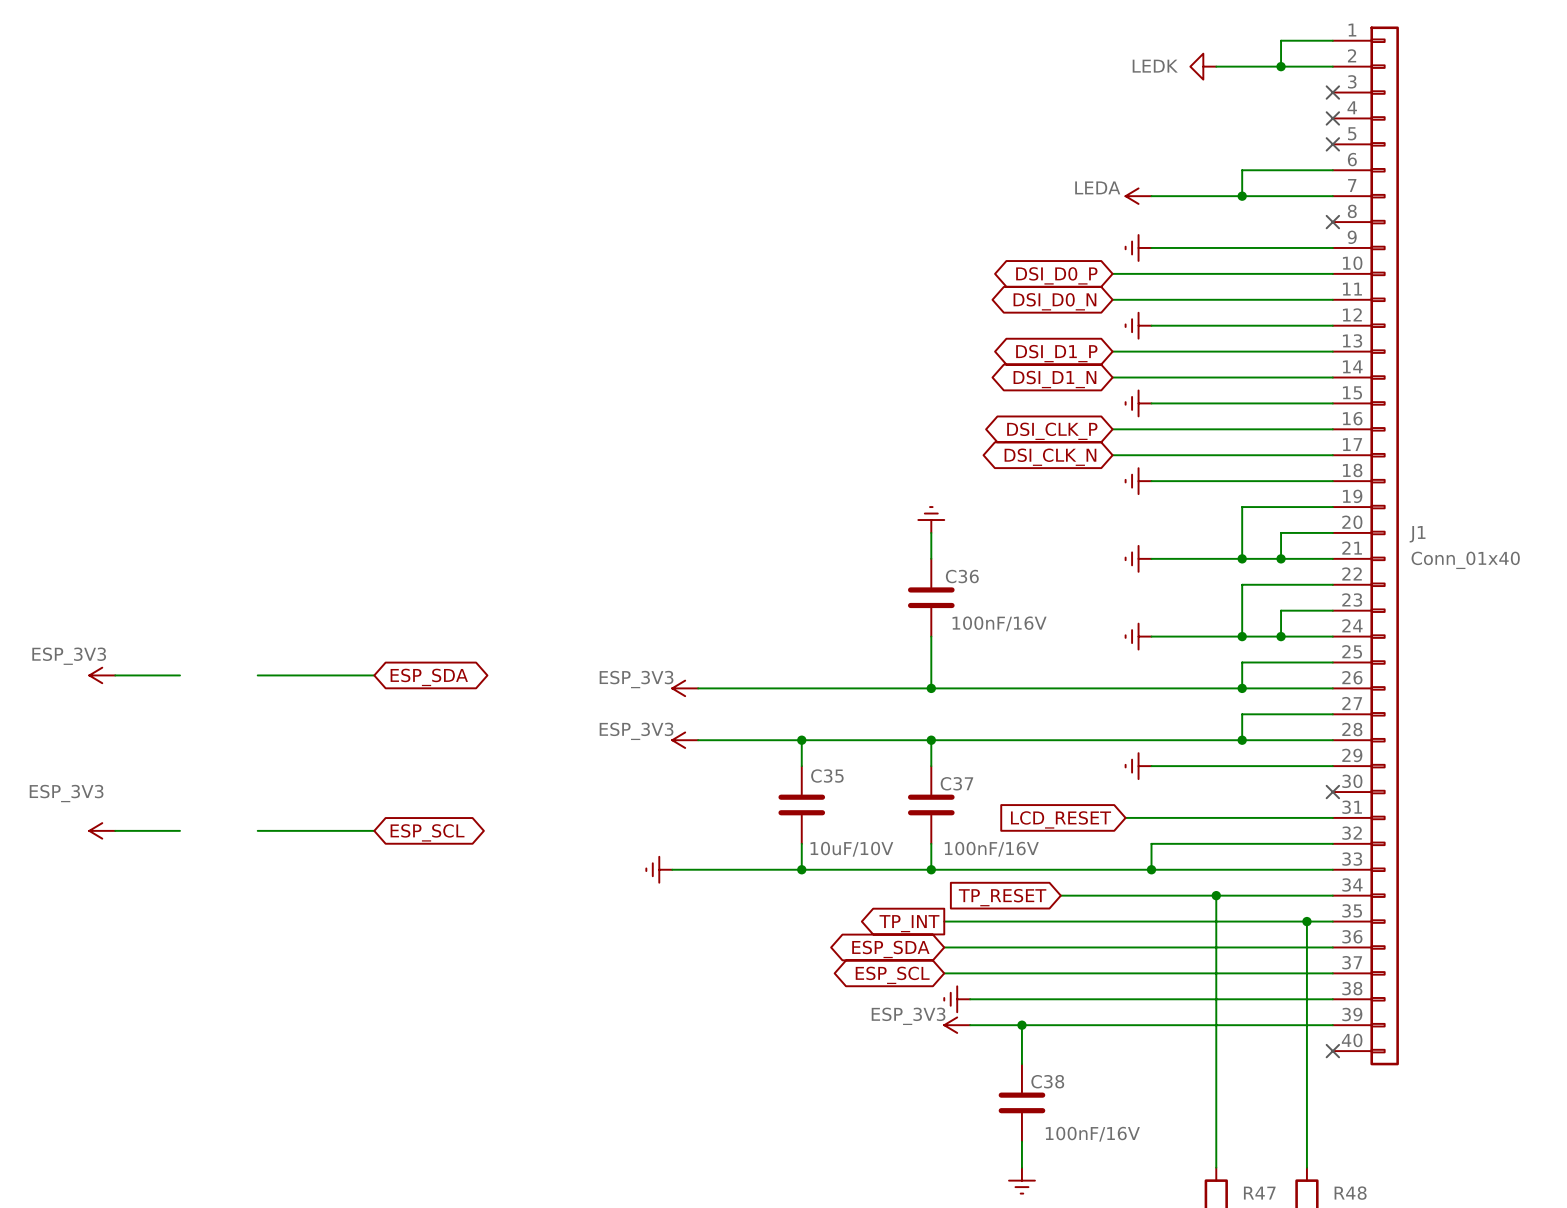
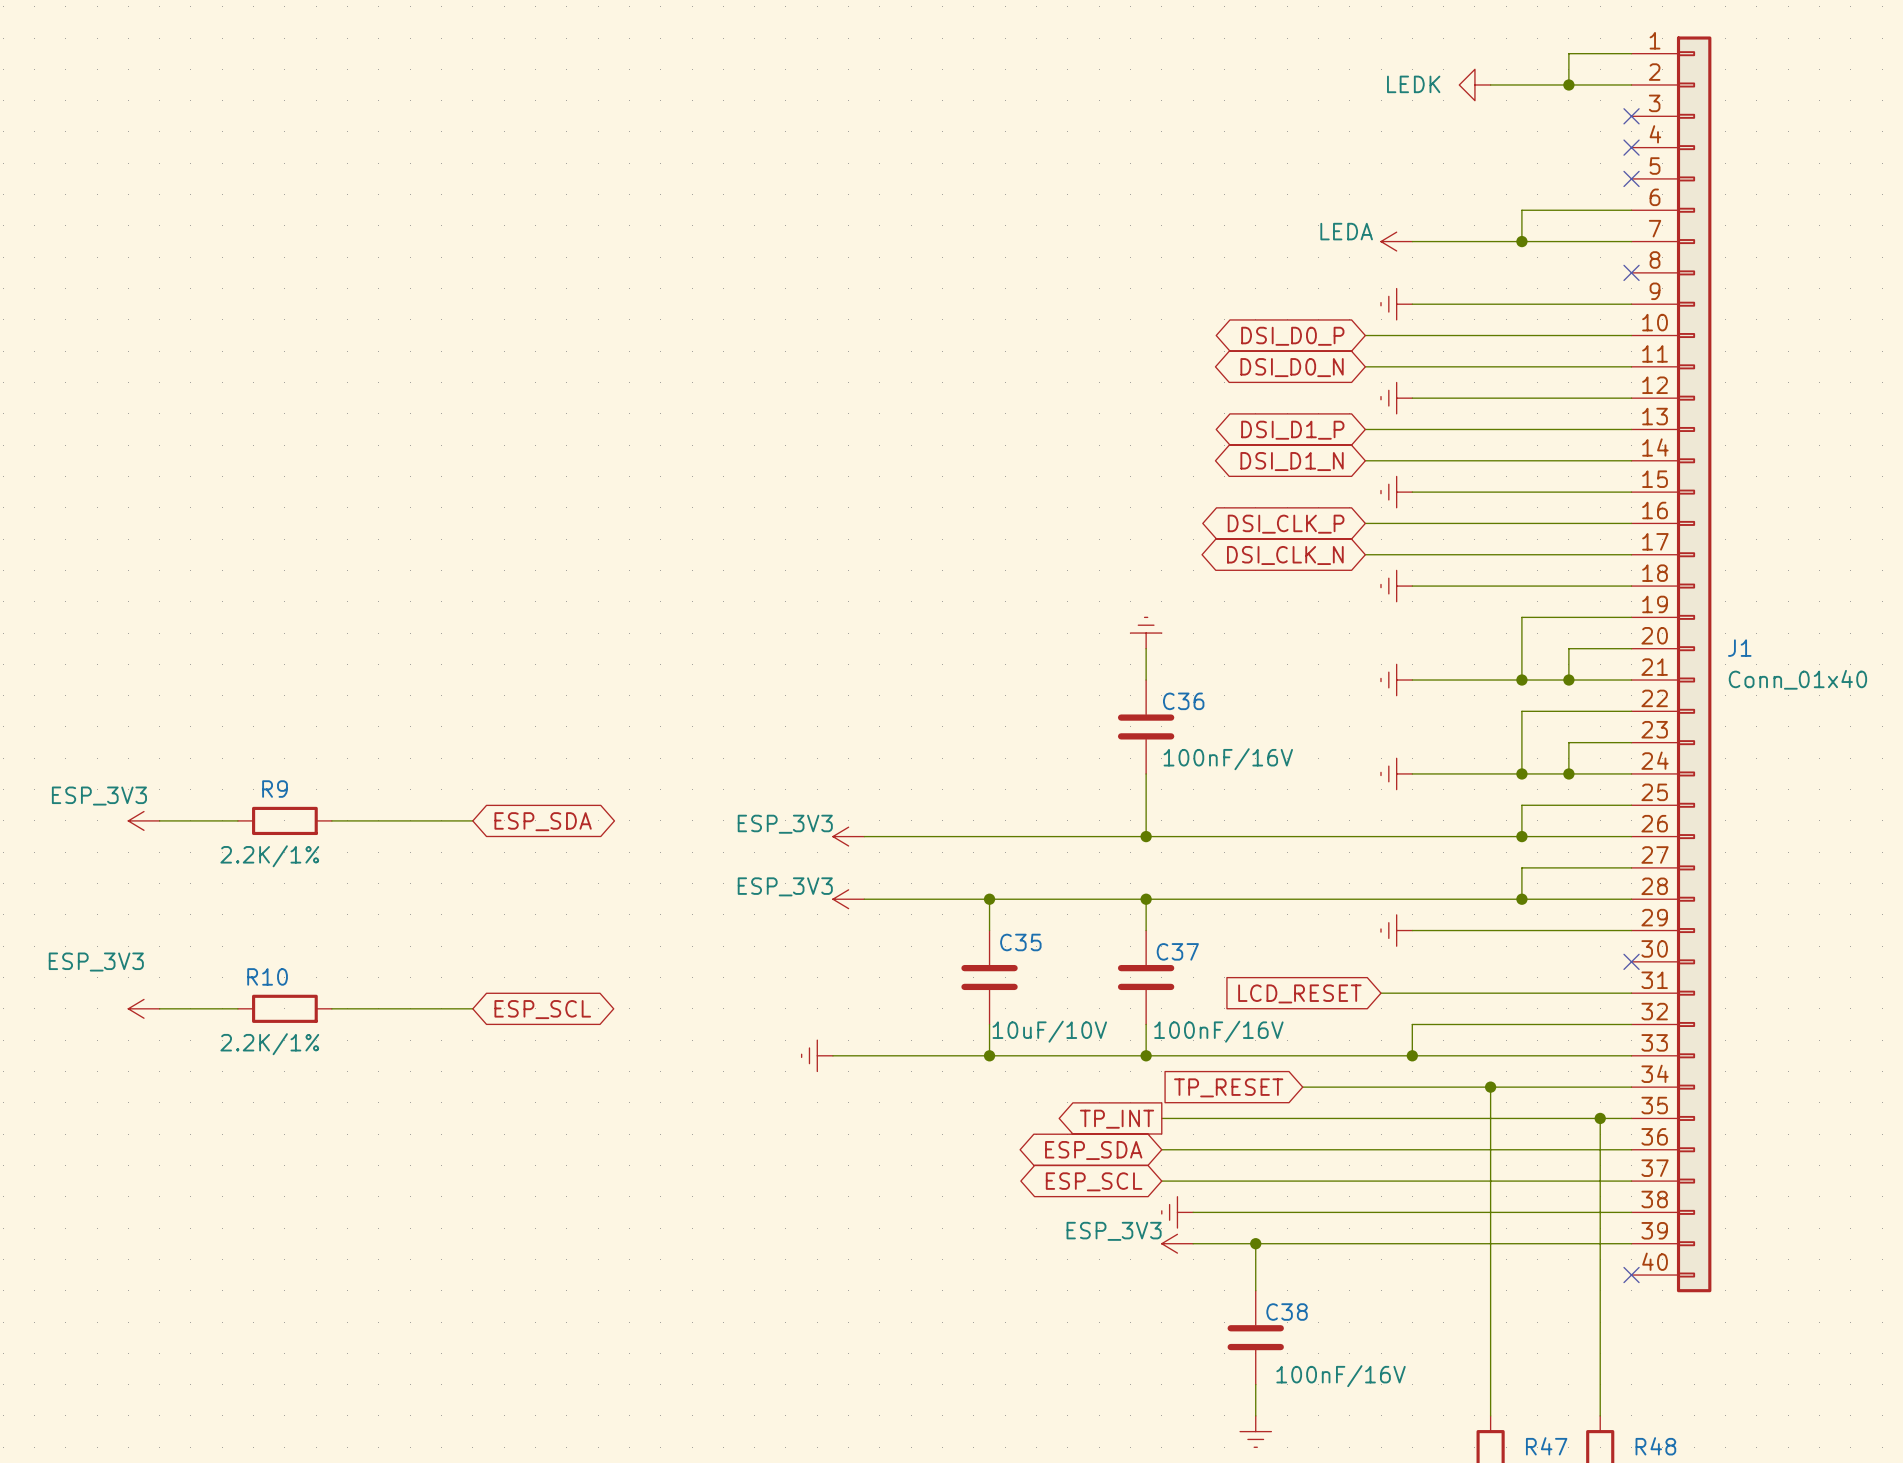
R9: none -> 2.2K/1% (284, 820)
R10: none -> 2.2K/1% (284, 1008)

